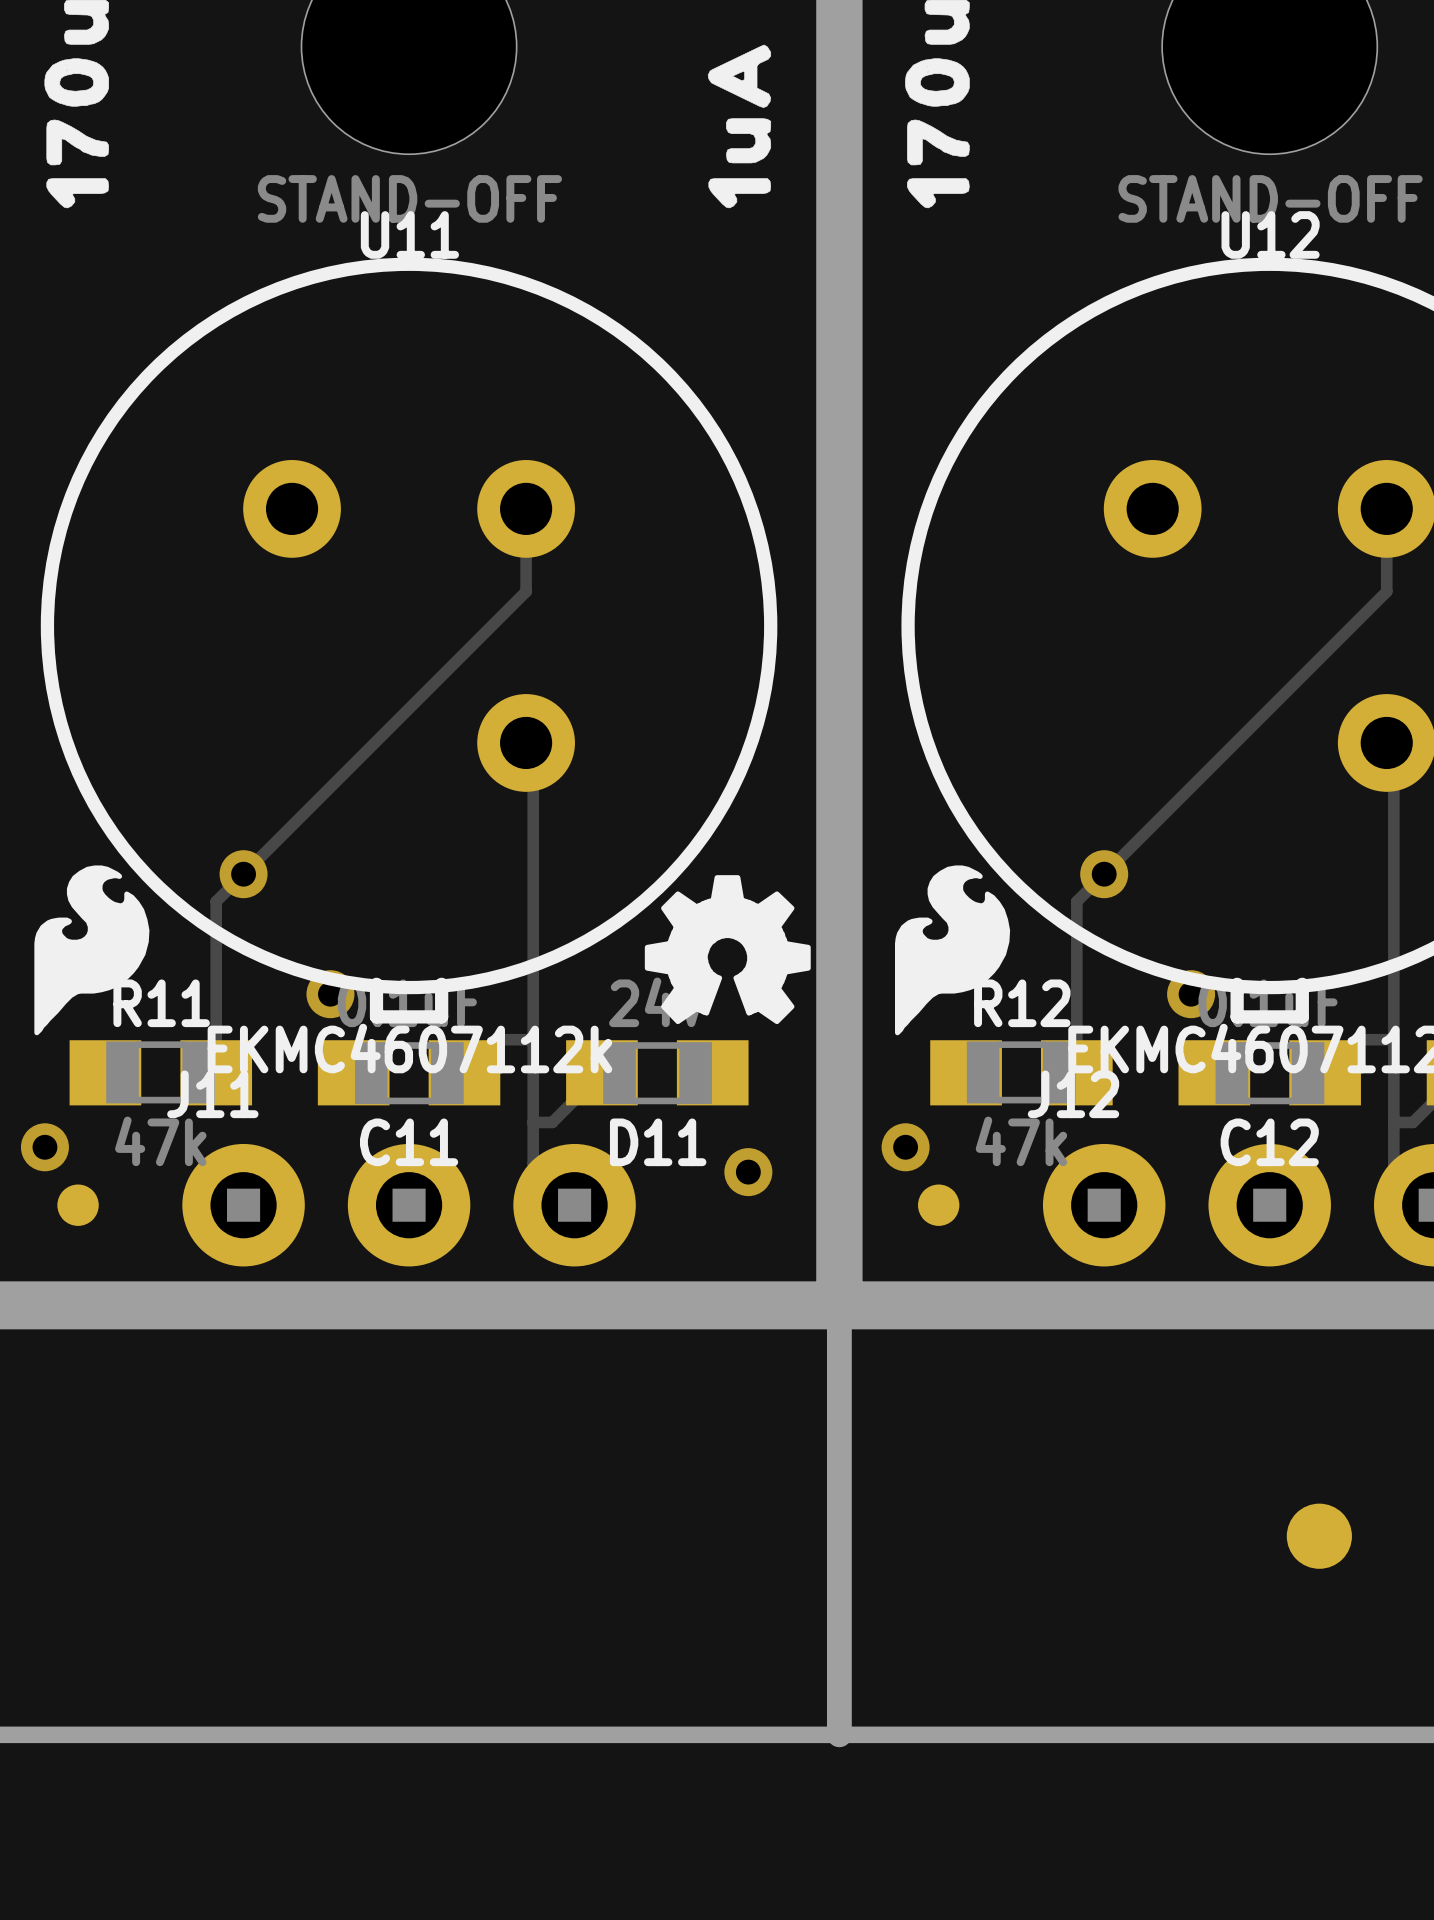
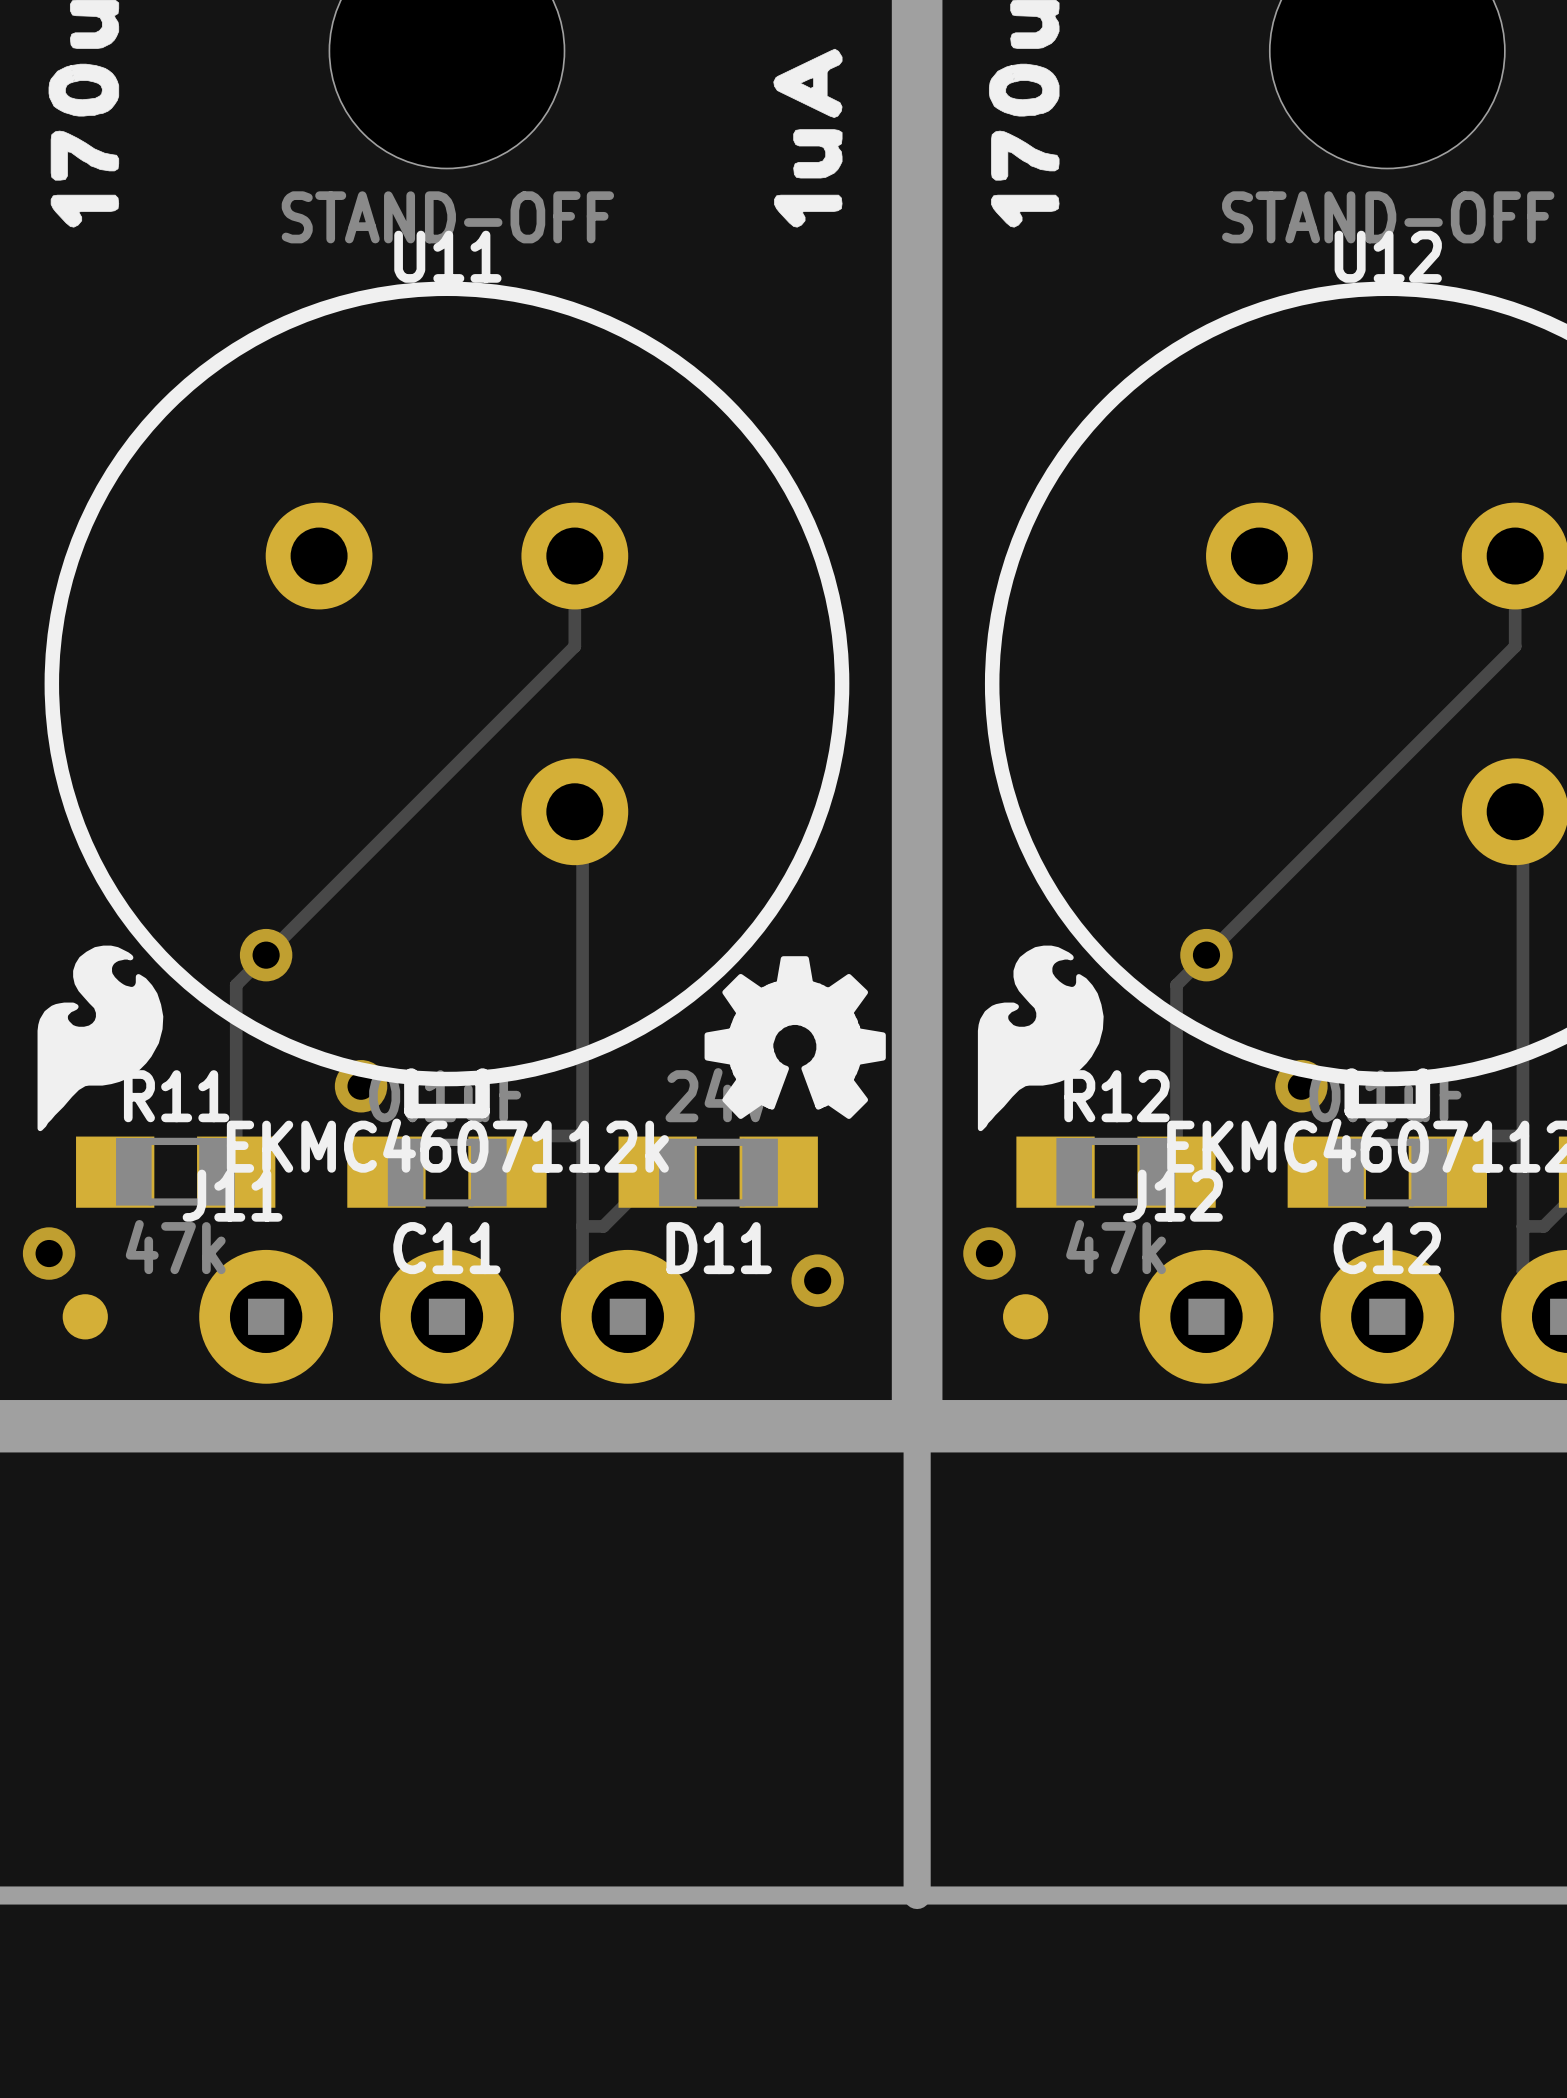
part: (1319, 1536) -> none

